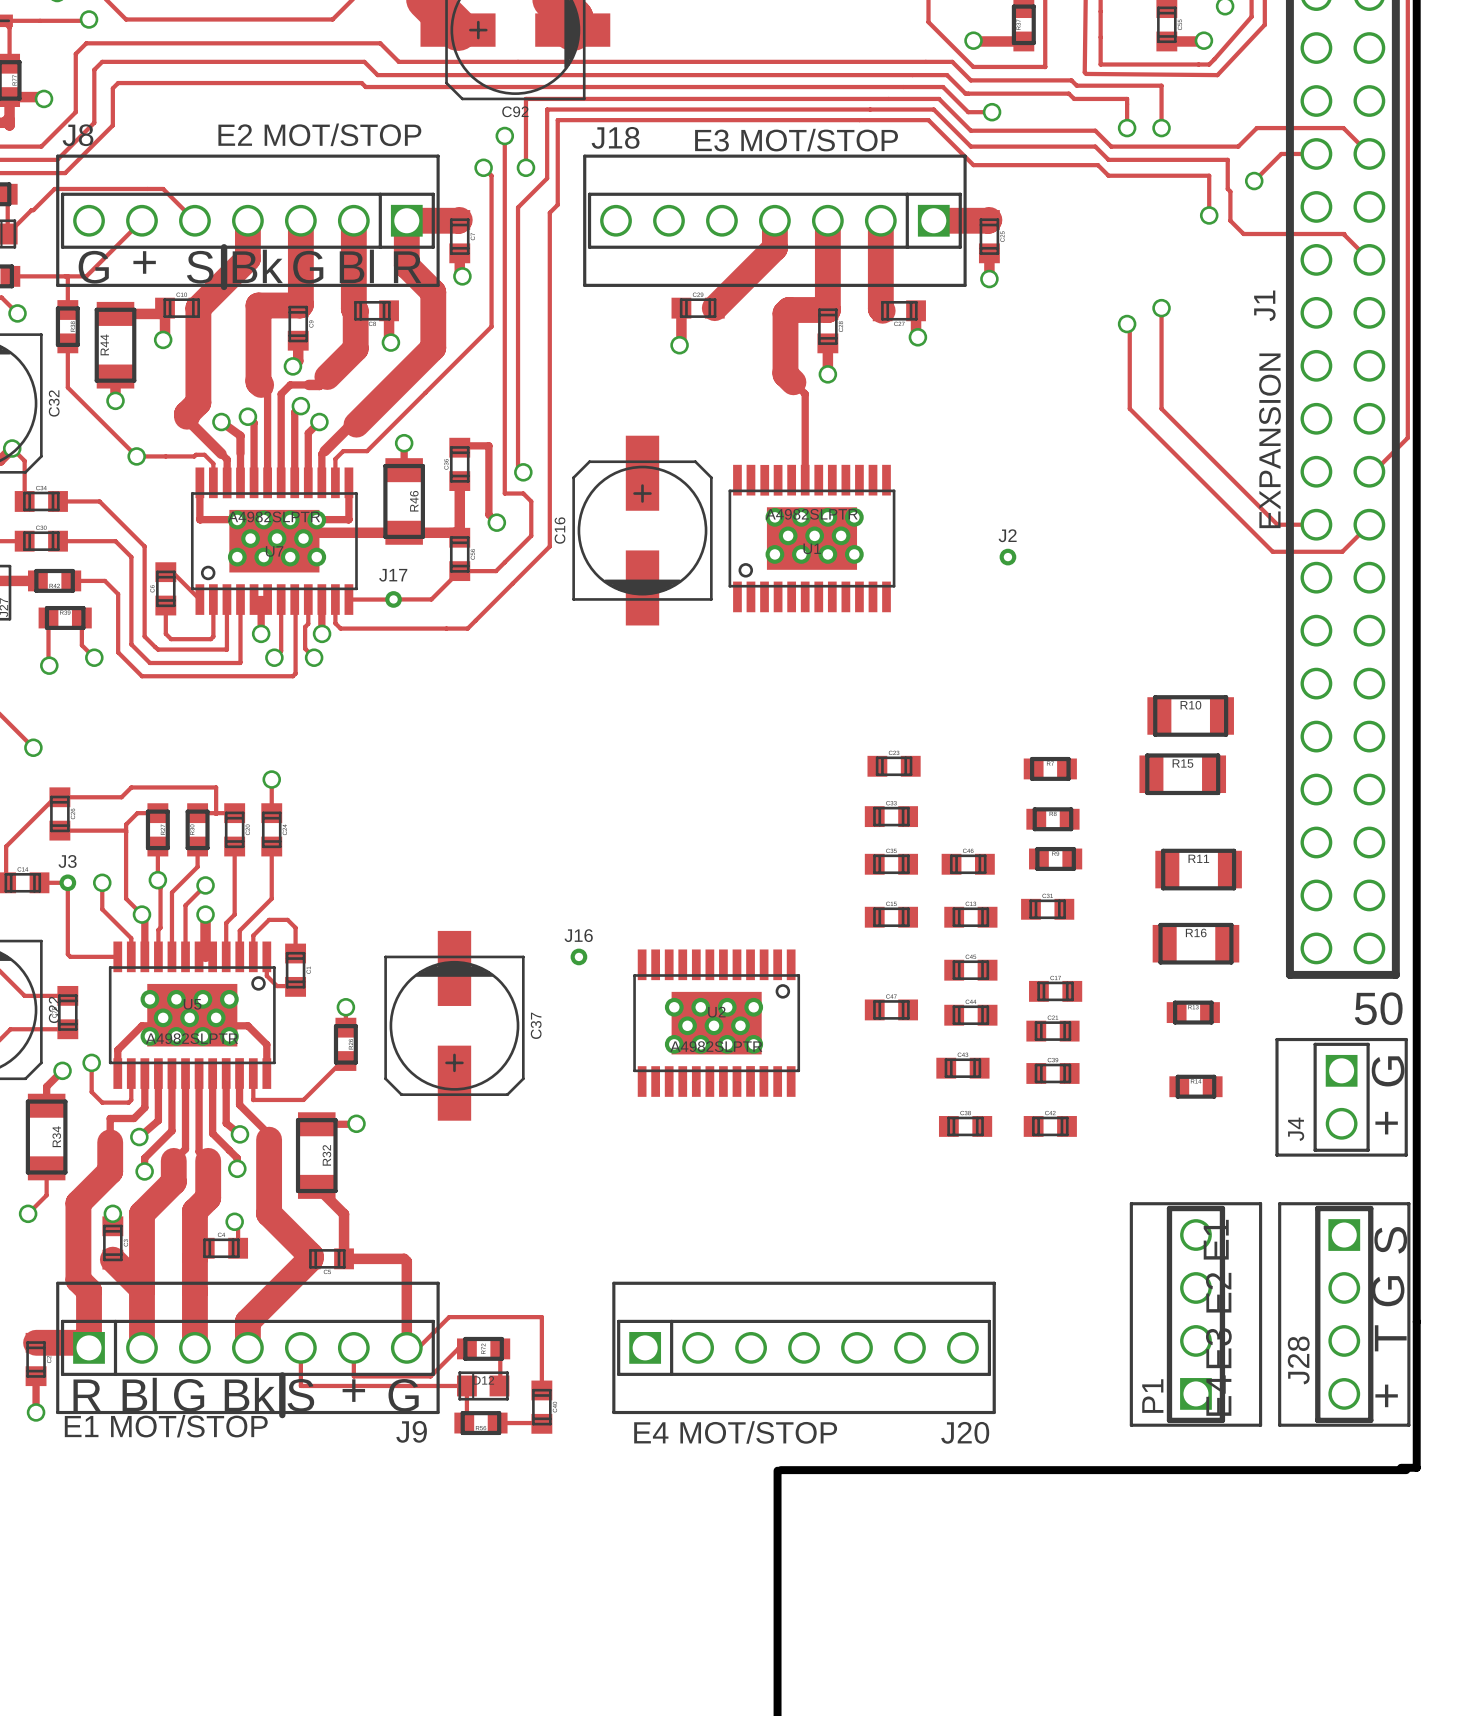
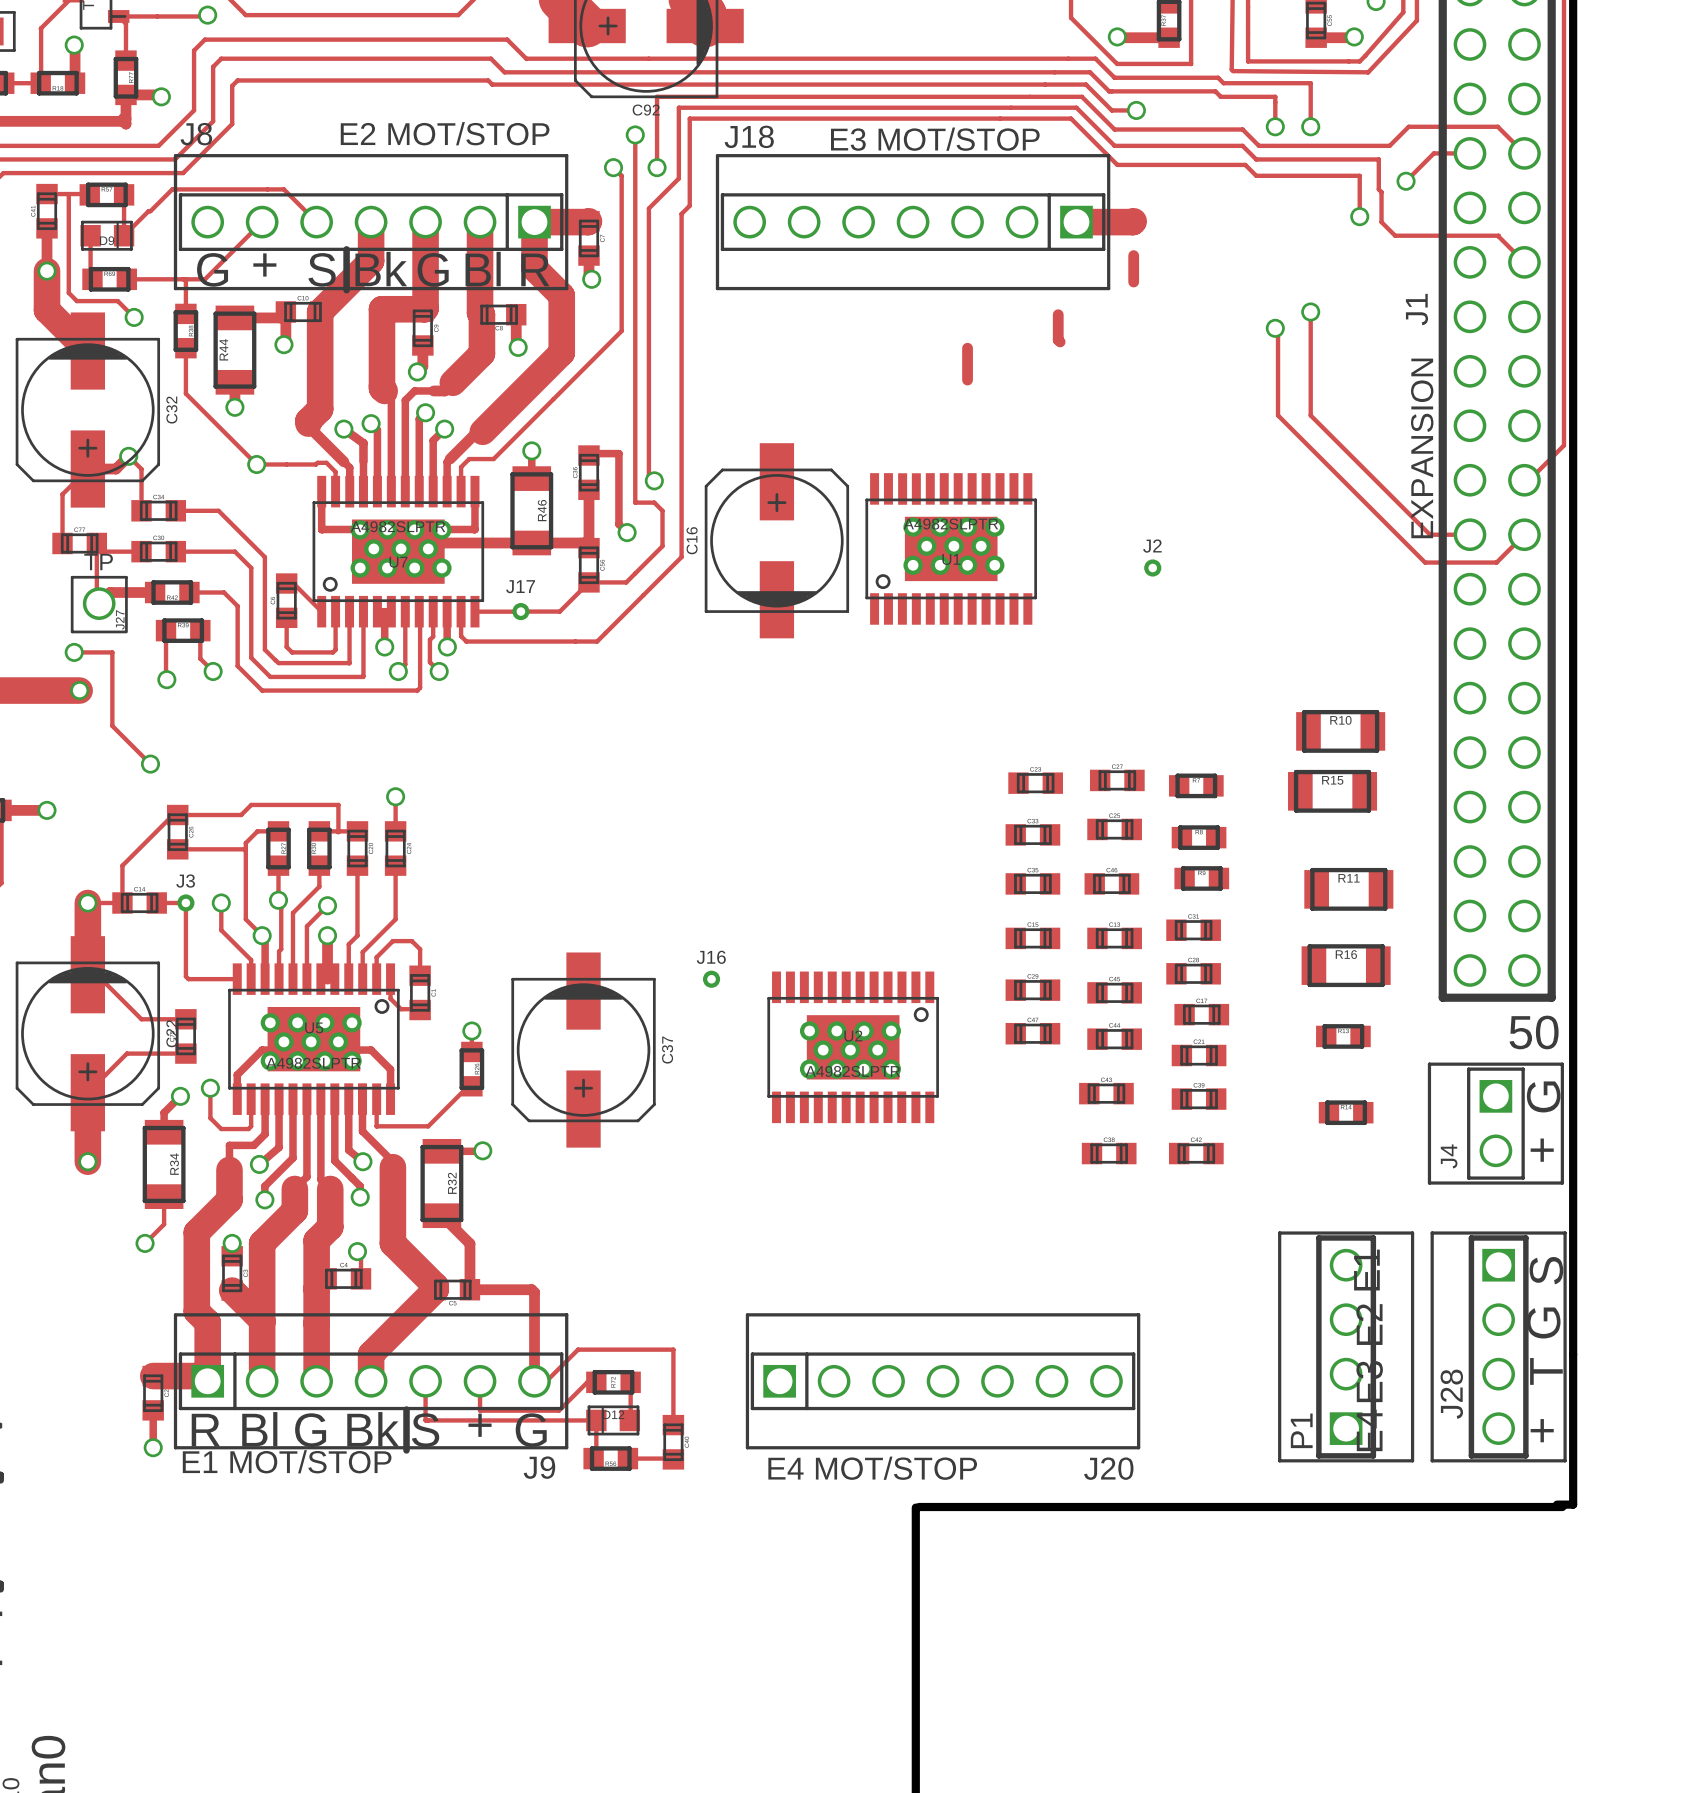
track: (774, 220) (774, 248) (714, 308) -> none
track: (827, 220) (827, 310) (788, 310) (785, 313) (785, 374) (805, 394) (805, 480) -> none
track: (880, 220) (880, 308) (882, 310) -> none
part rotation: 0° (989, 236) -> 90° counterclockwise (1114, 829)
part position: (989, 236) -> (1114, 829)
via: (989, 279) -> none
track: (681, 308) (681, 343) (679, 345) -> none
part position: (698, 308) -> (1032, 990)
part rotation: 0° (899, 310) -> 180° (1117, 780)
part position: (899, 310) -> (1117, 780)
part rotation: 0° (827, 326) -> 90° counterclockwise (1193, 973)
part position: (827, 326) -> (1193, 973)
via: (917, 337) -> none
via: (679, 345) -> none
via: (827, 374) -> none

